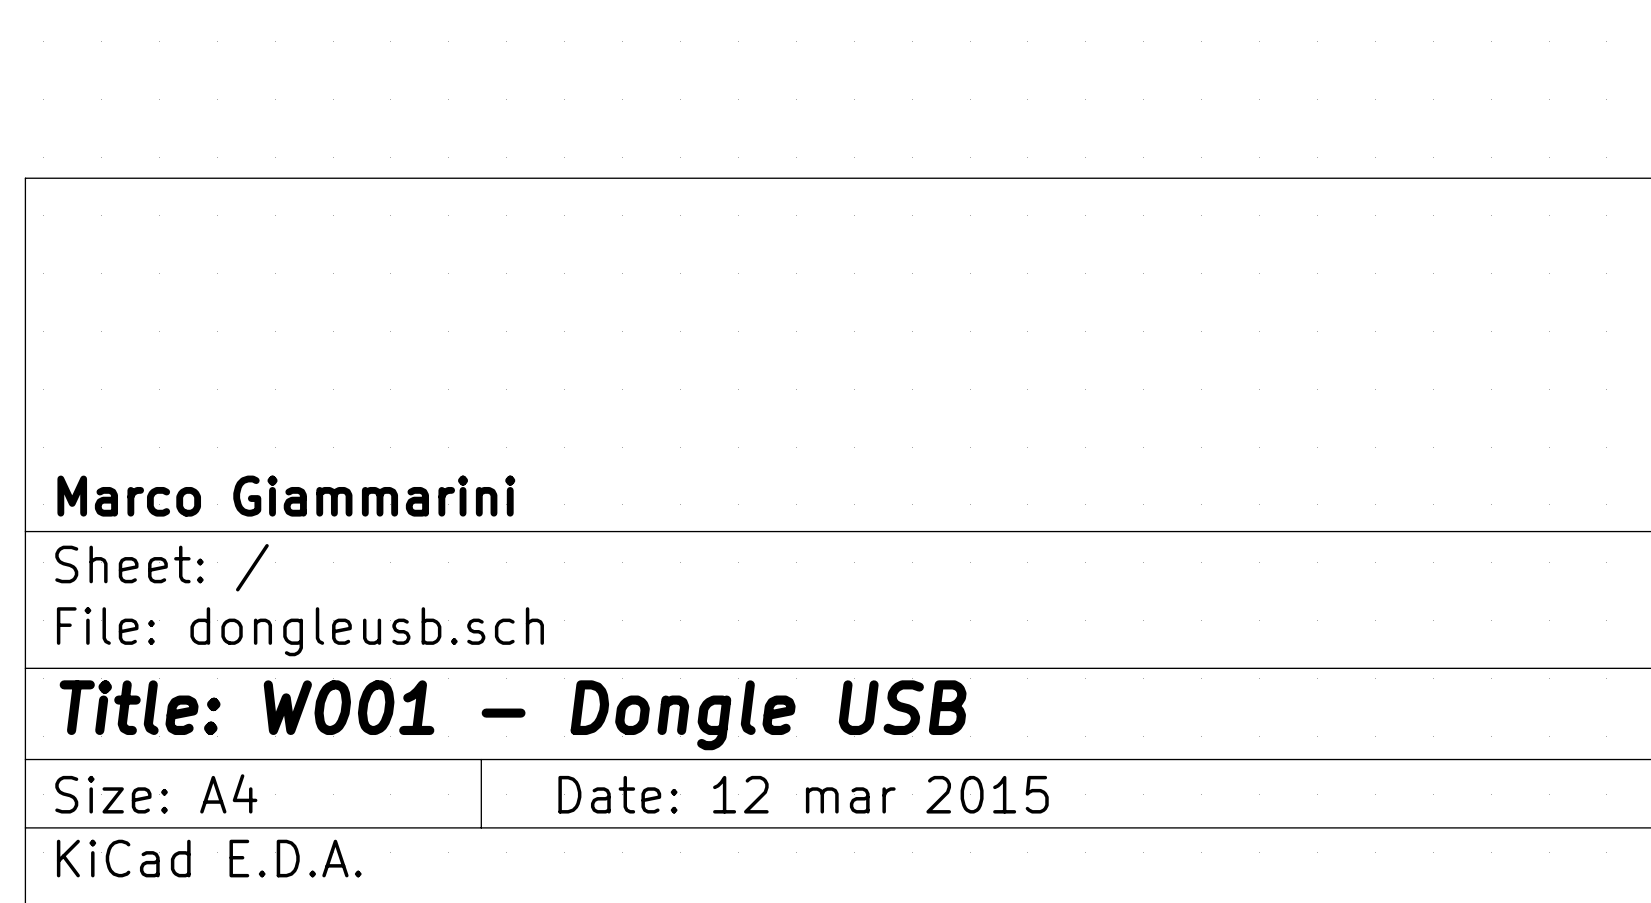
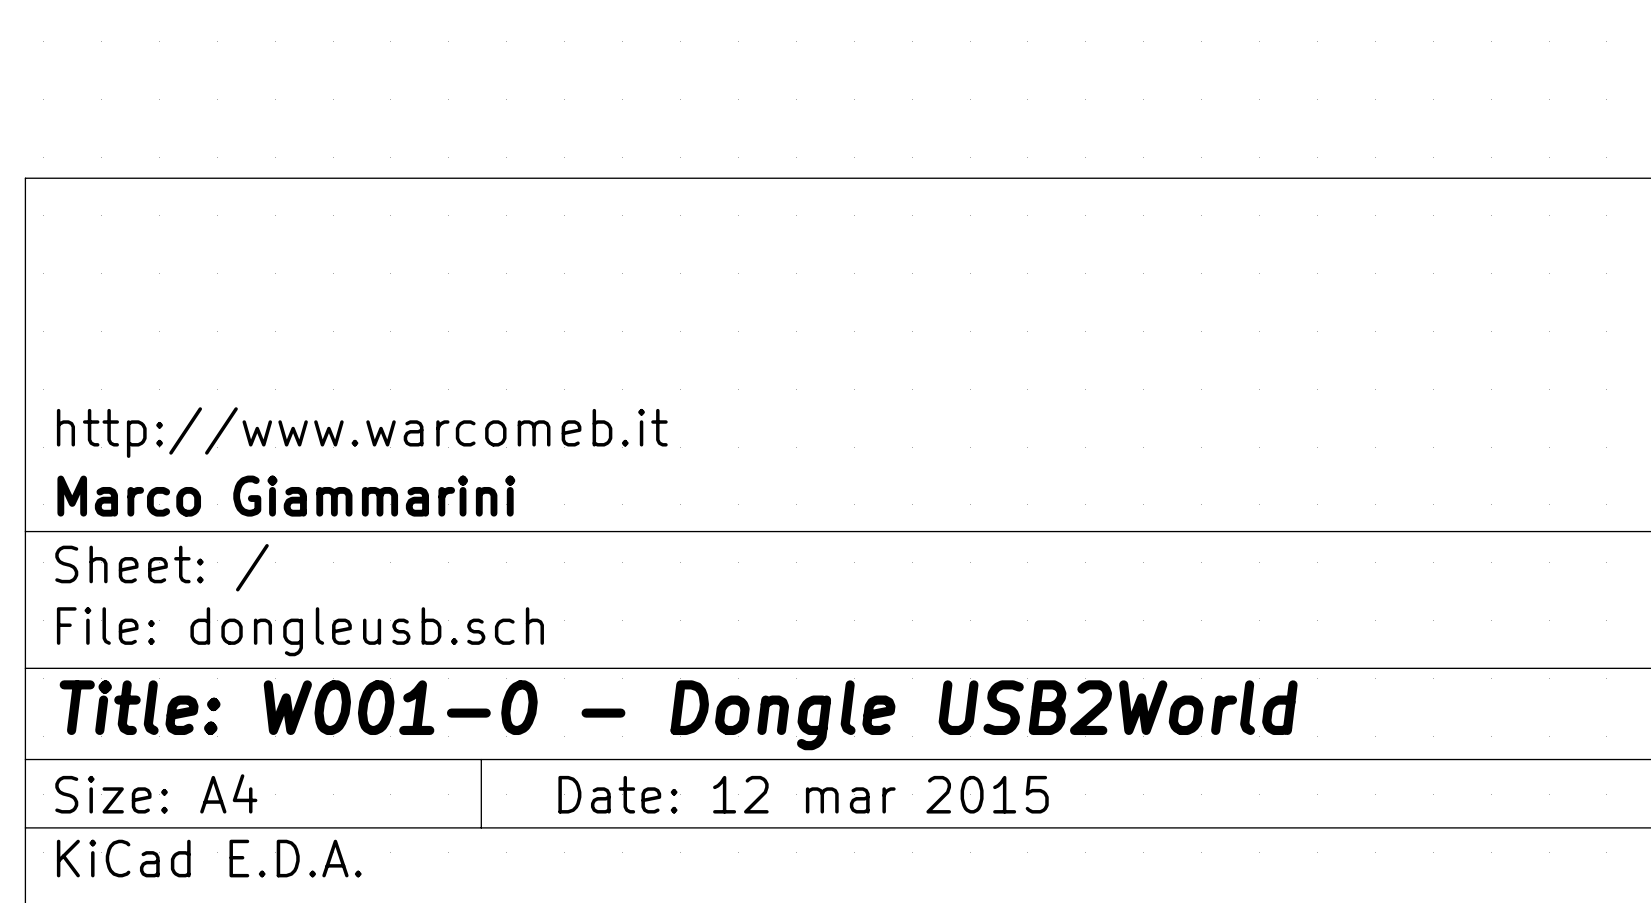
title block: none -> http://www.warcomeb.it (362, 432)
title block: Title: W001 - Dongle USB (513, 715) -> Title: W001-0 - Dongle USB2World (678, 715)

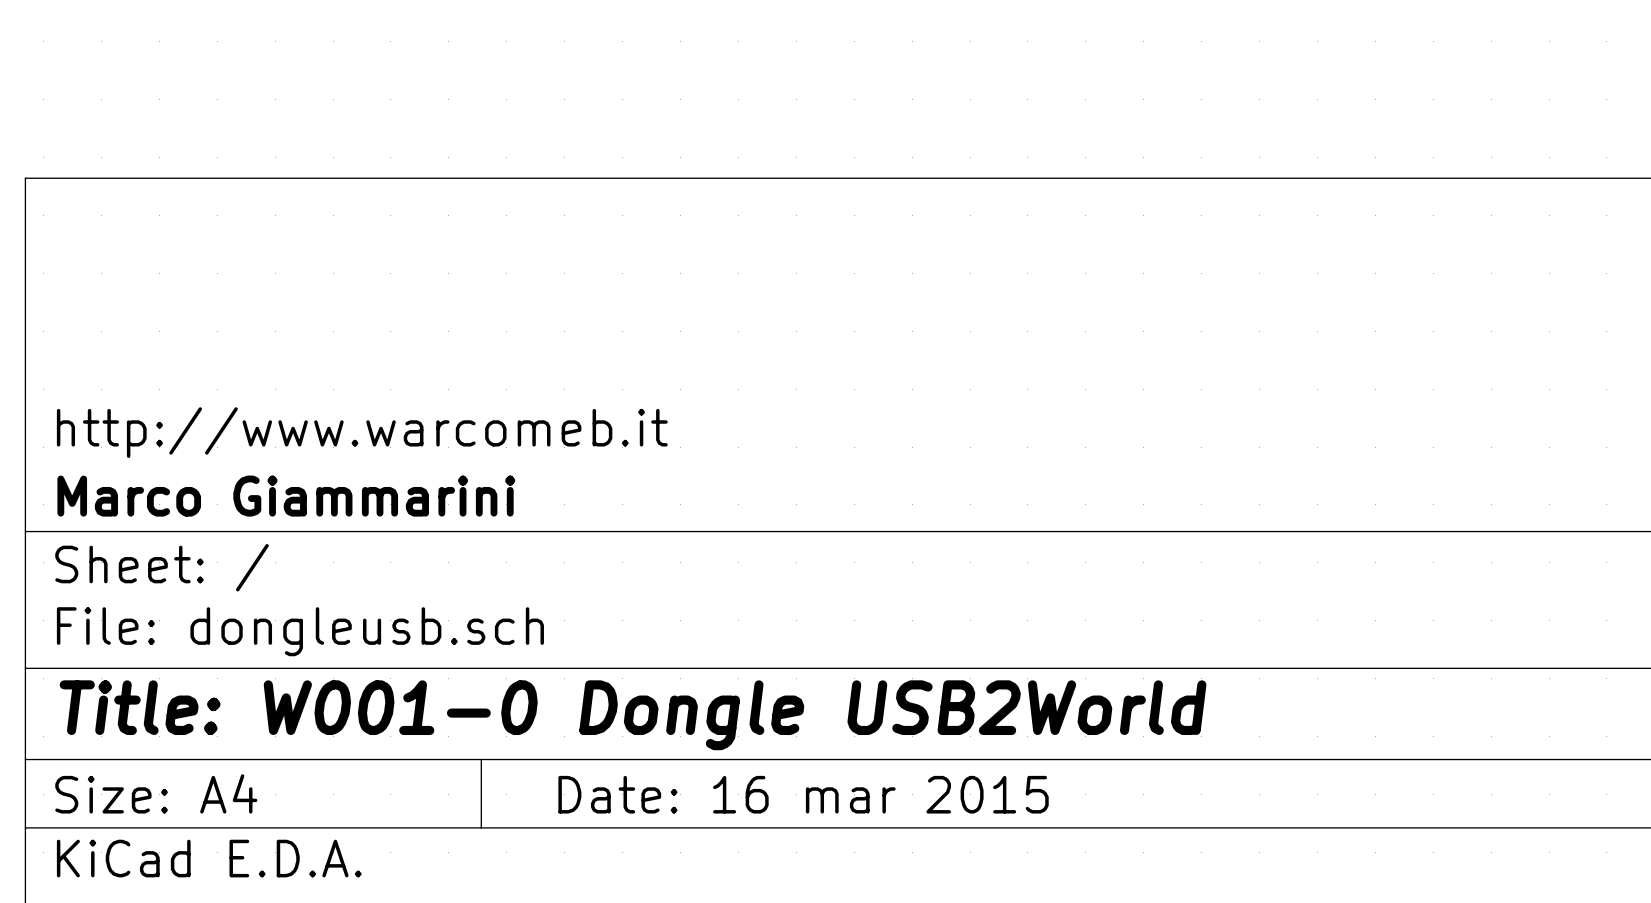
title block: Title: W001-0 - Dongle USB2World (678, 715) -> Title: W001-0 Dongle USB2World (633, 715)
title block: Date: 12 mar 2015 (803, 794) -> Date: 16 mar 2015 (803, 794)

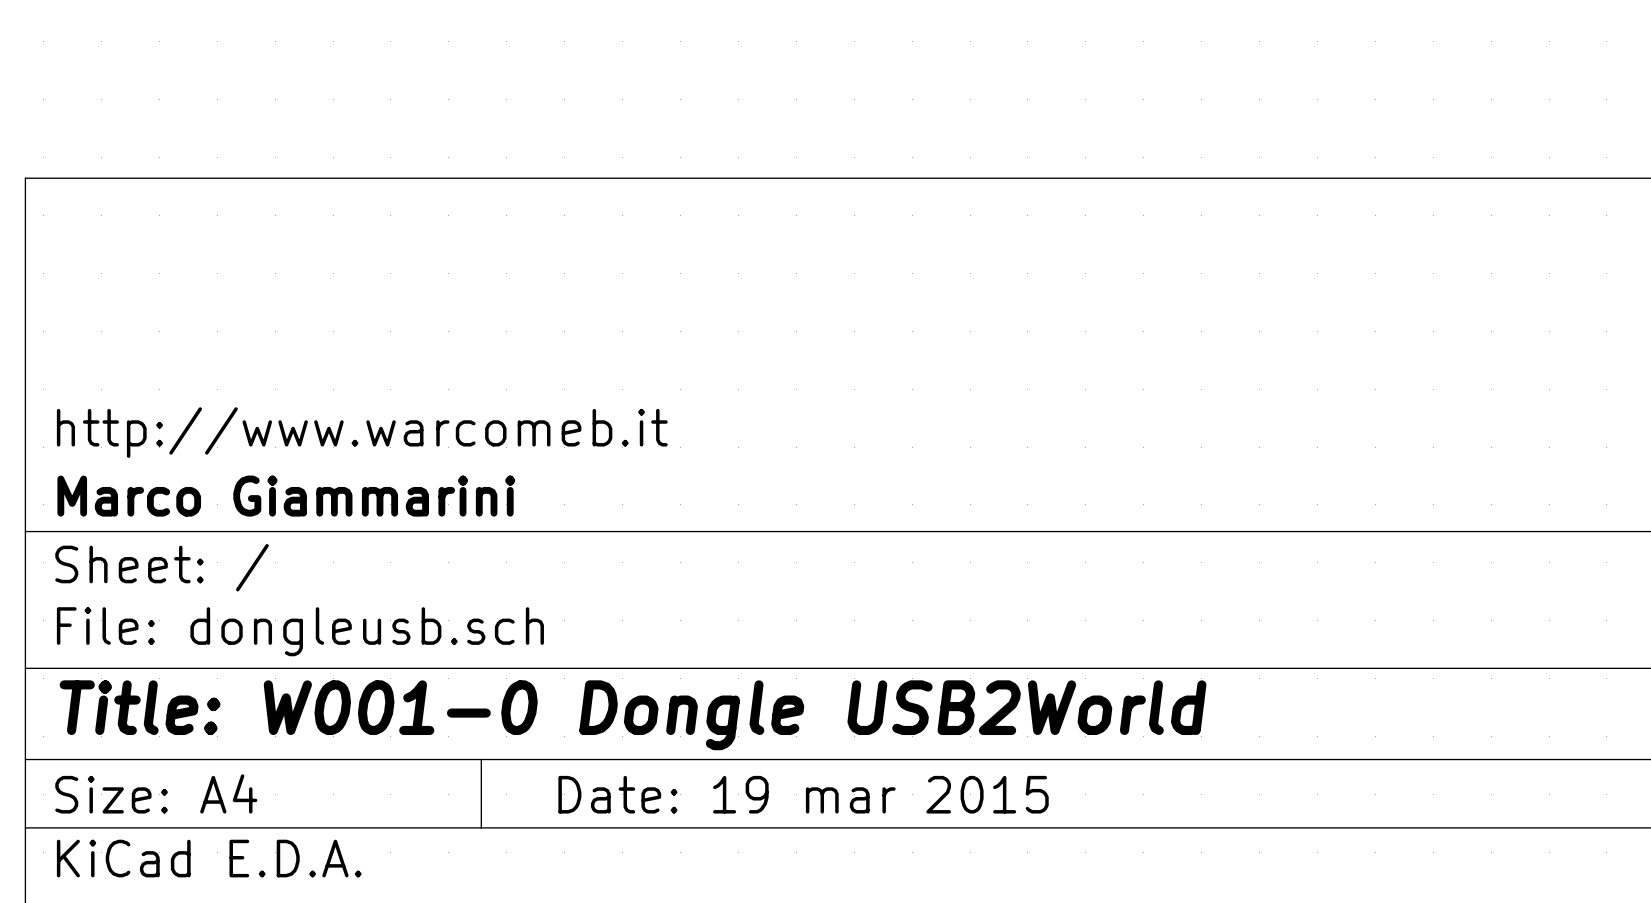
title block: Date: 16 mar 2015 (803, 794) -> Date: 19 mar 2015 (803, 794)

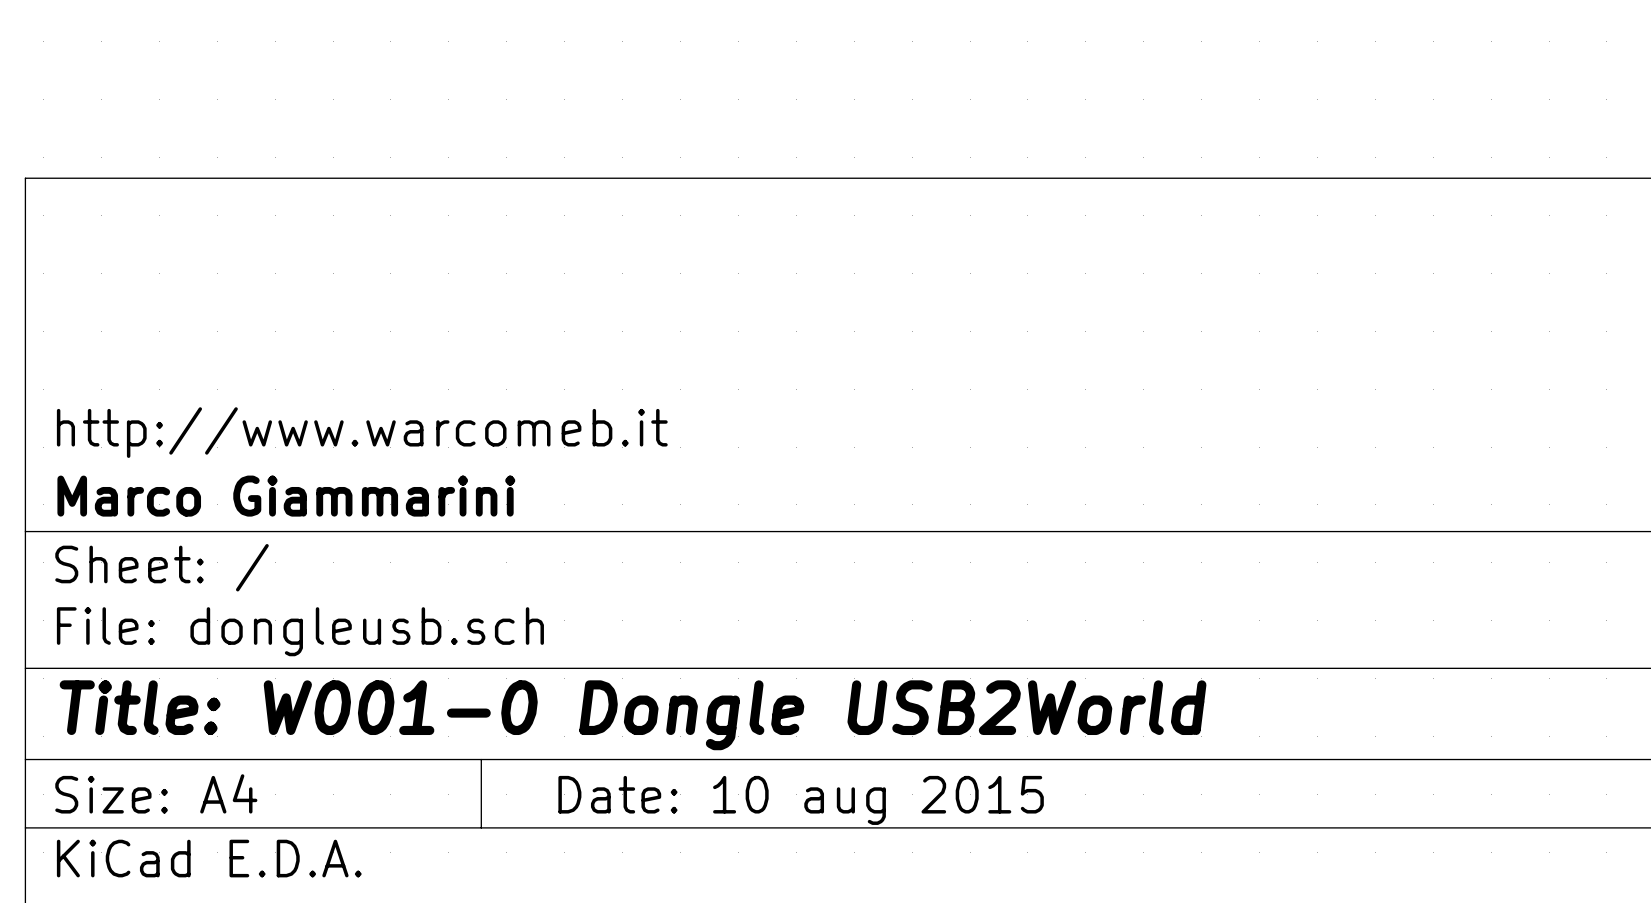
title block: Date: 19 mar 2015 (803, 794) -> Date: 10 aug 2015 (801, 800)

